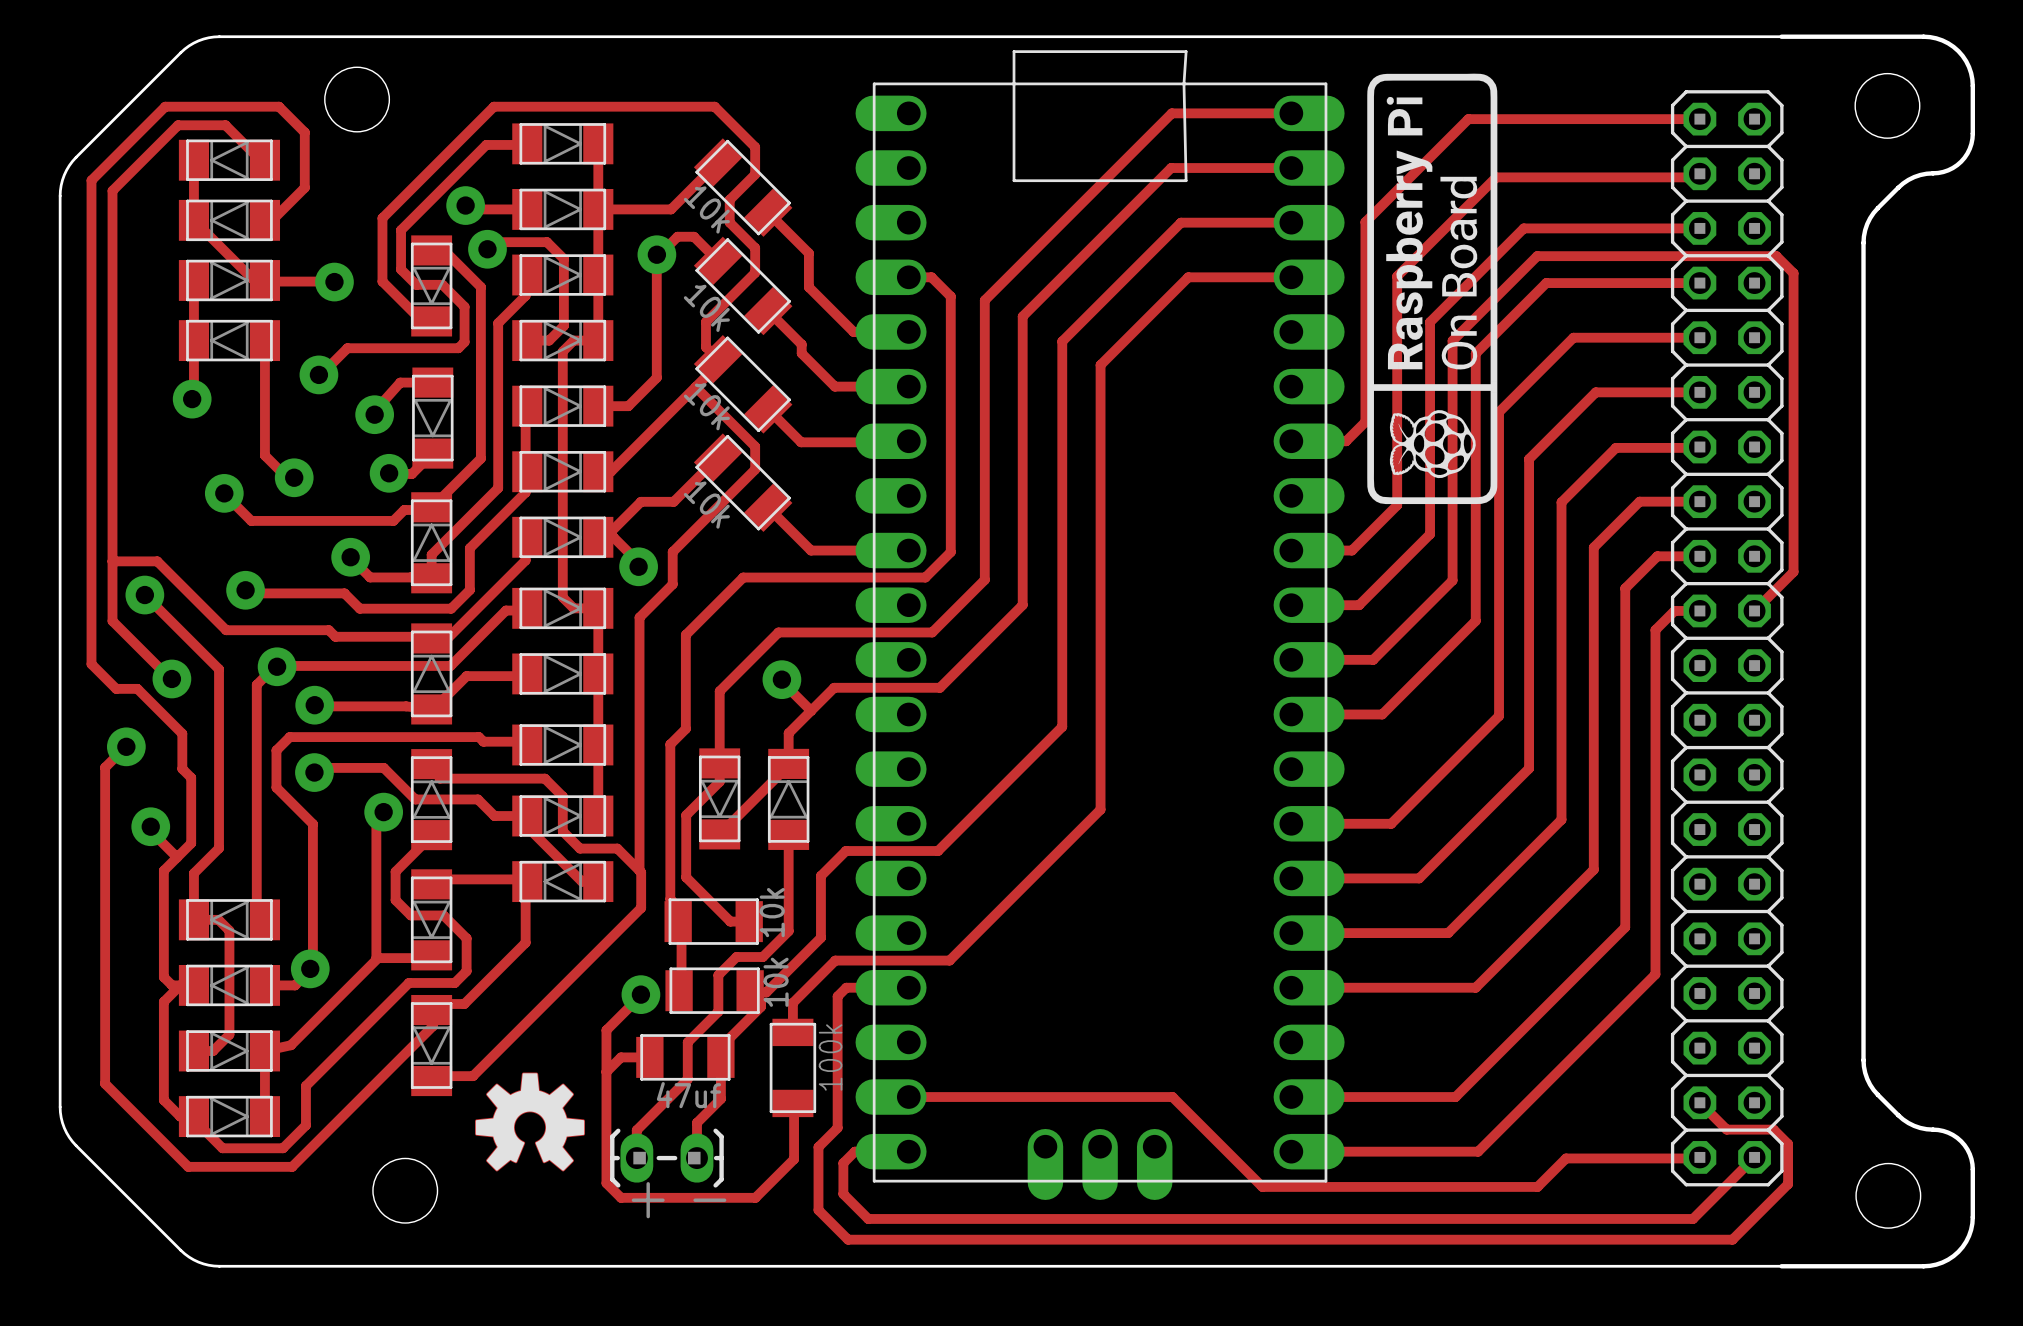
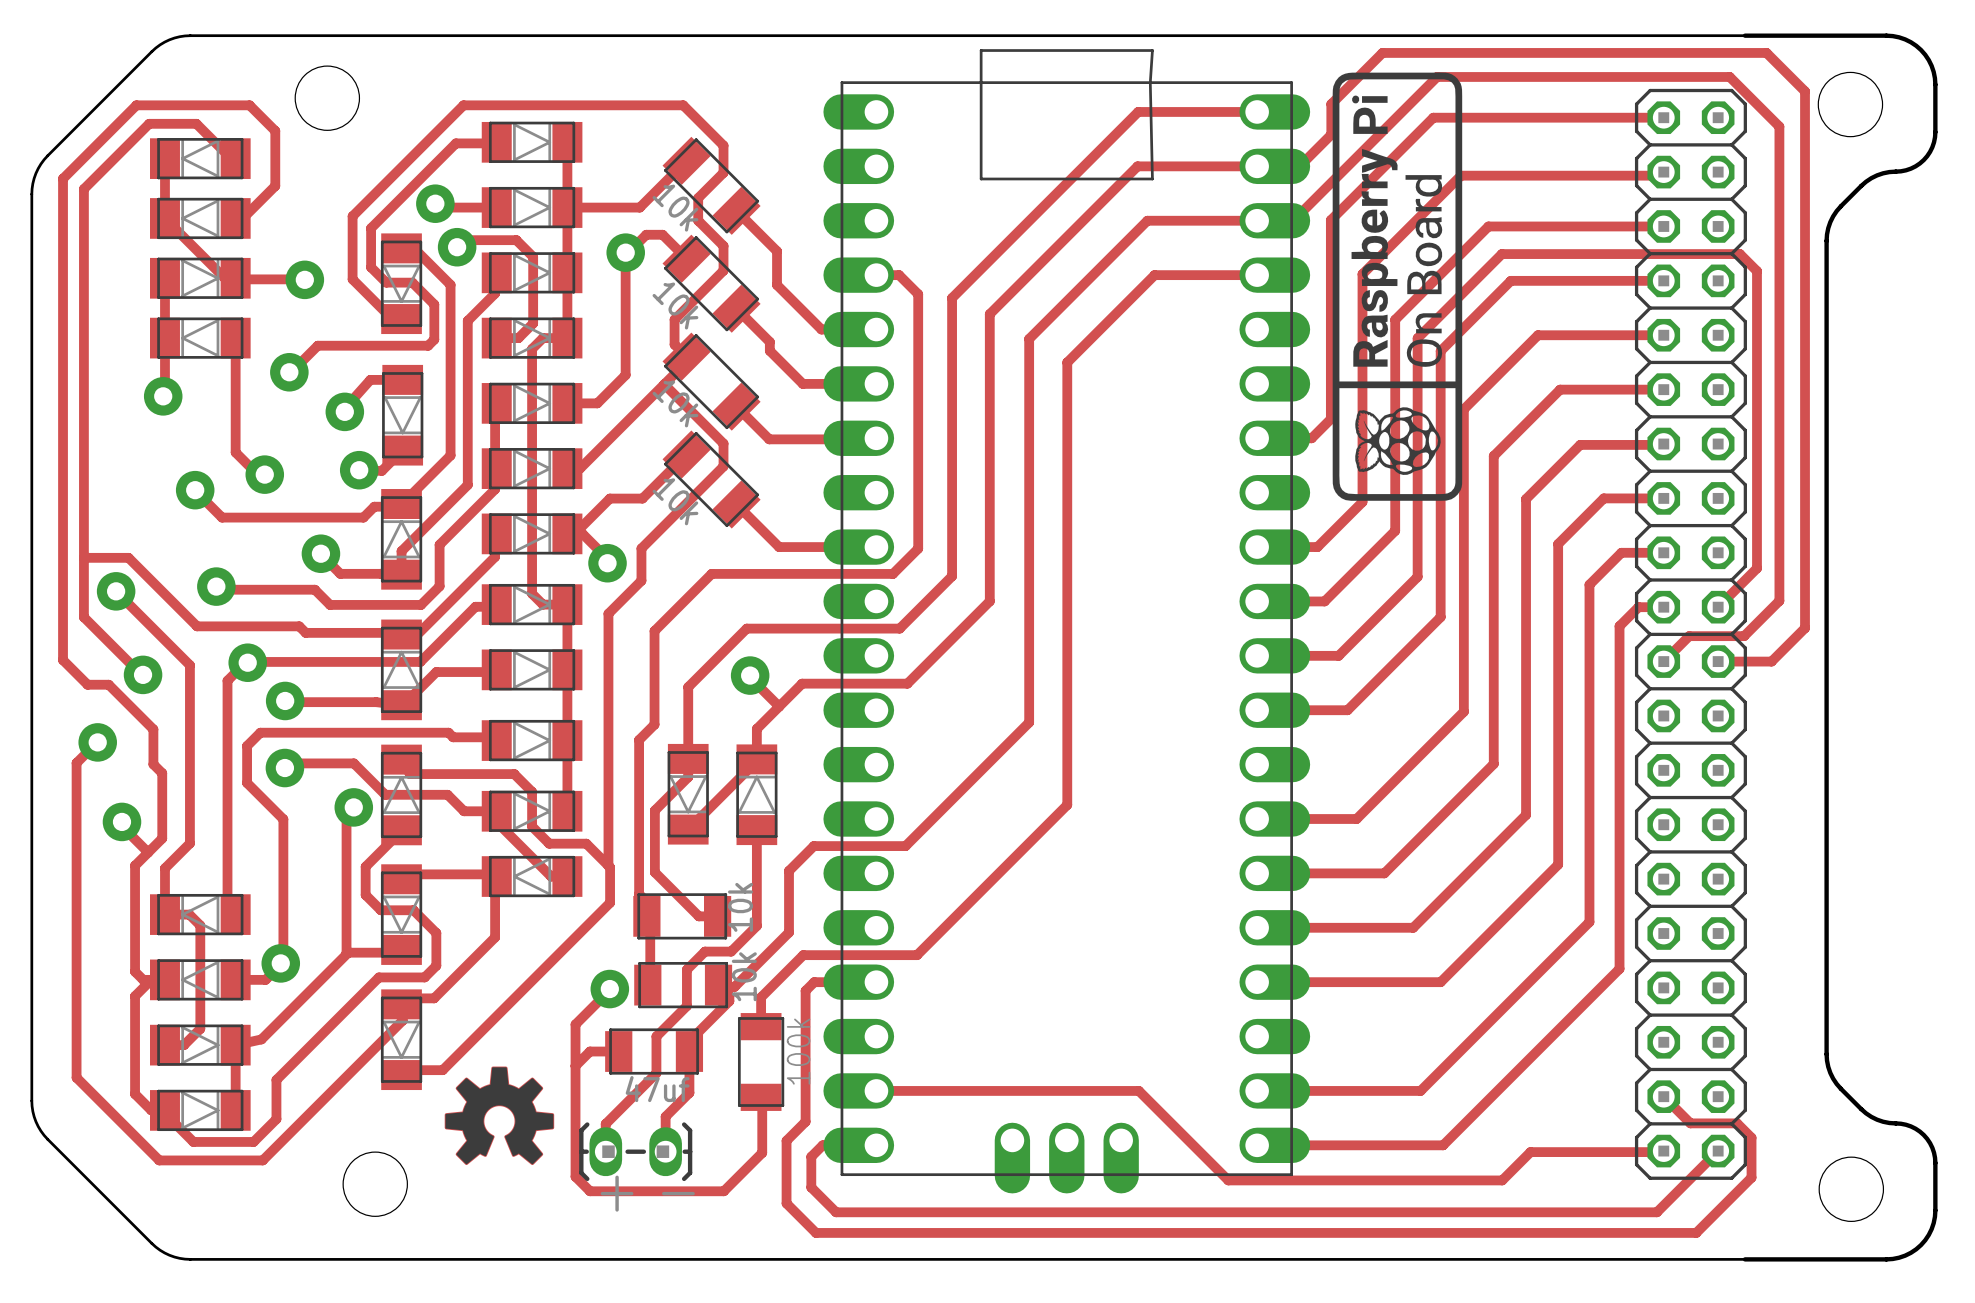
track: none -> (1257, 166) (1299, 166) (1331, 134) (1331, 104) (1382, 52) (1766, 52) (1805, 91) (1805, 628) (1771, 661) (1718, 661)
track: none -> (1257, 220) (1293, 220) (1437, 76) (1729, 76) (1779, 126) (1779, 600) (1744, 636) (1689, 636) (1663, 661)

